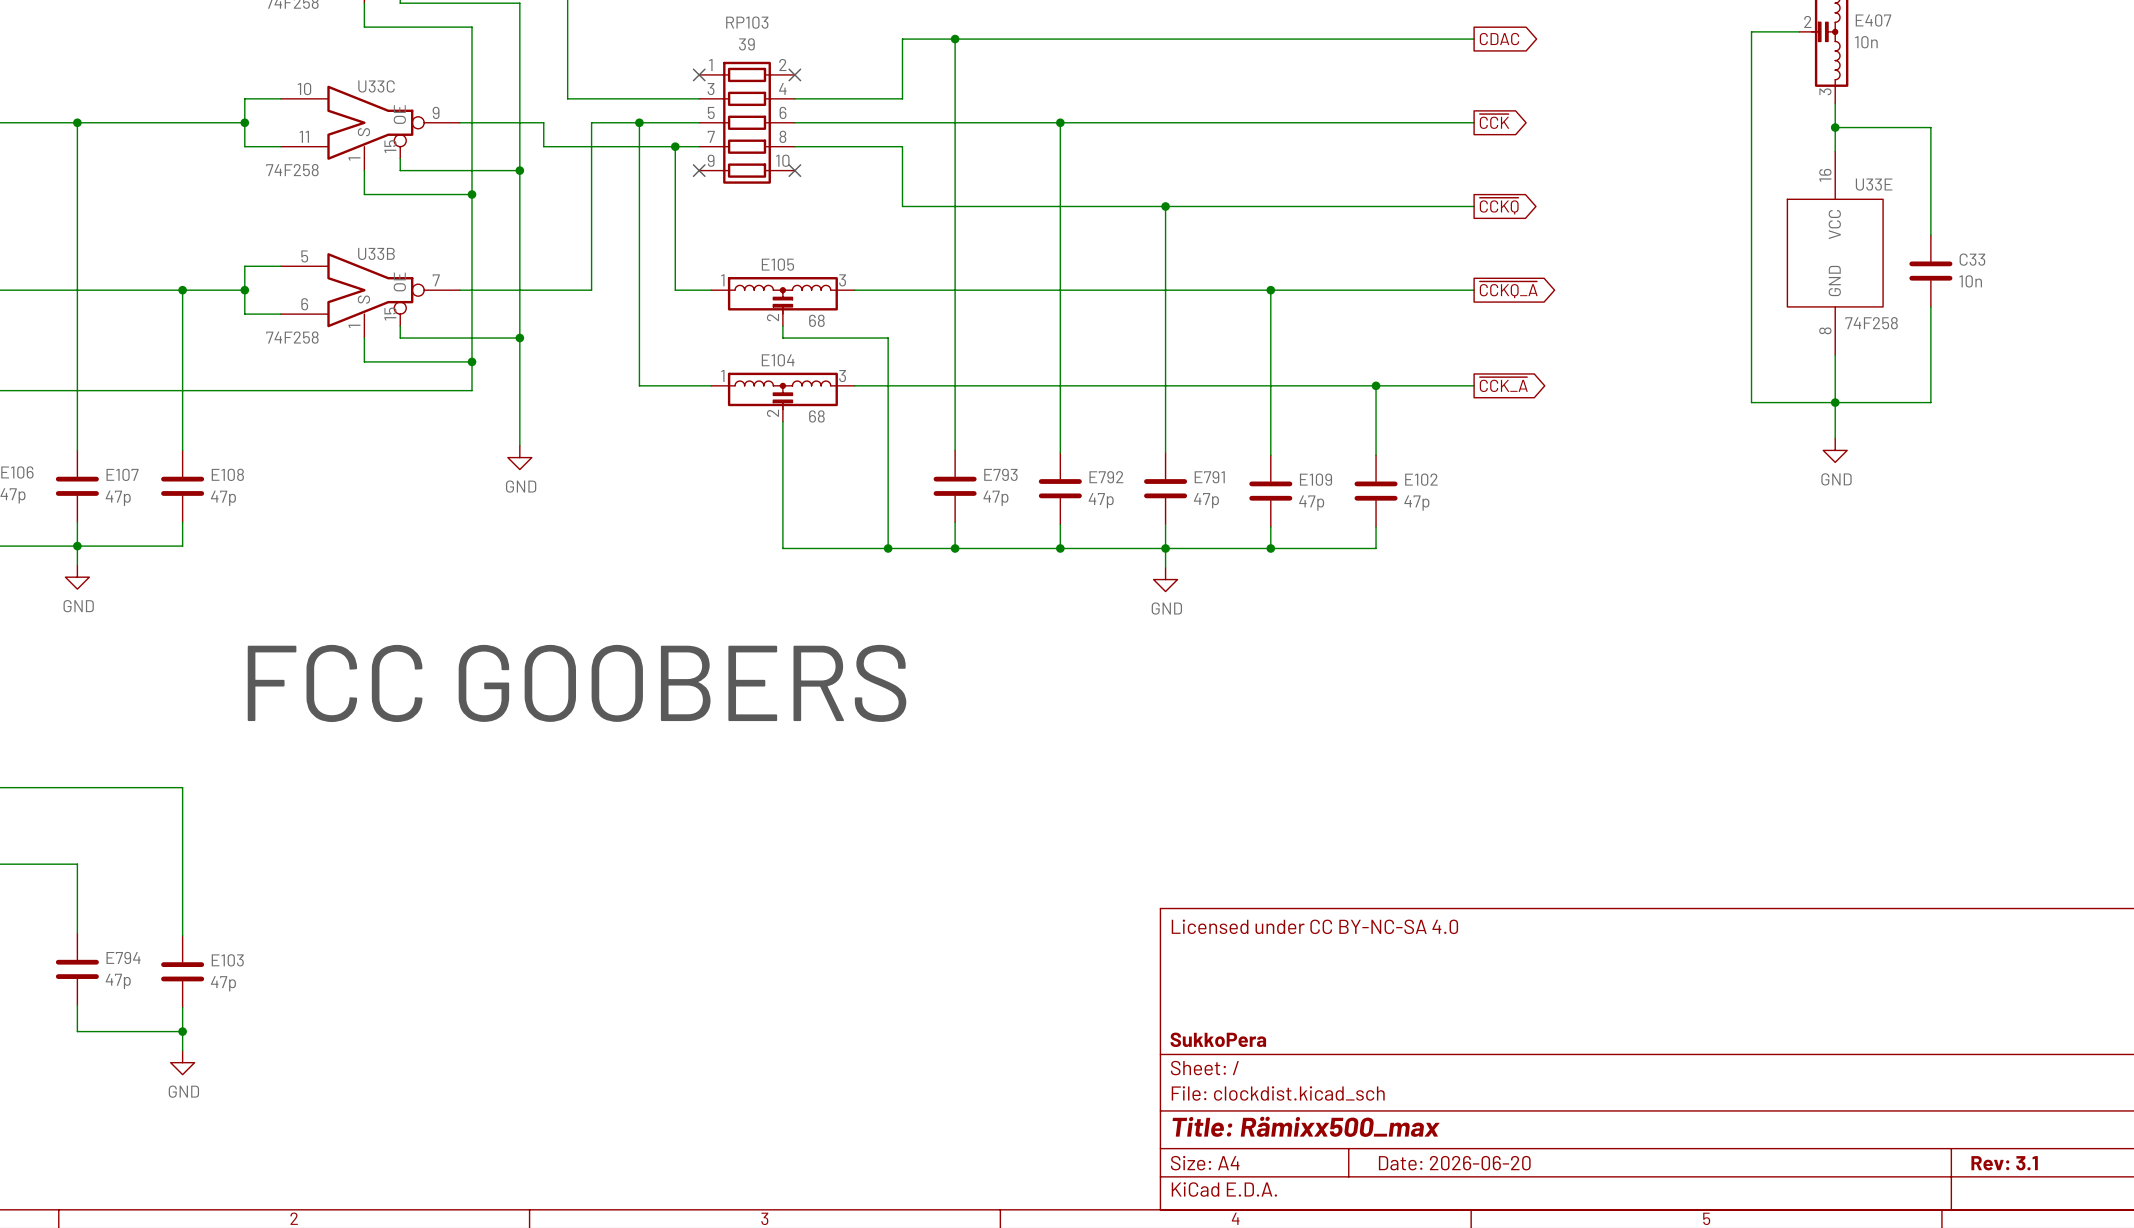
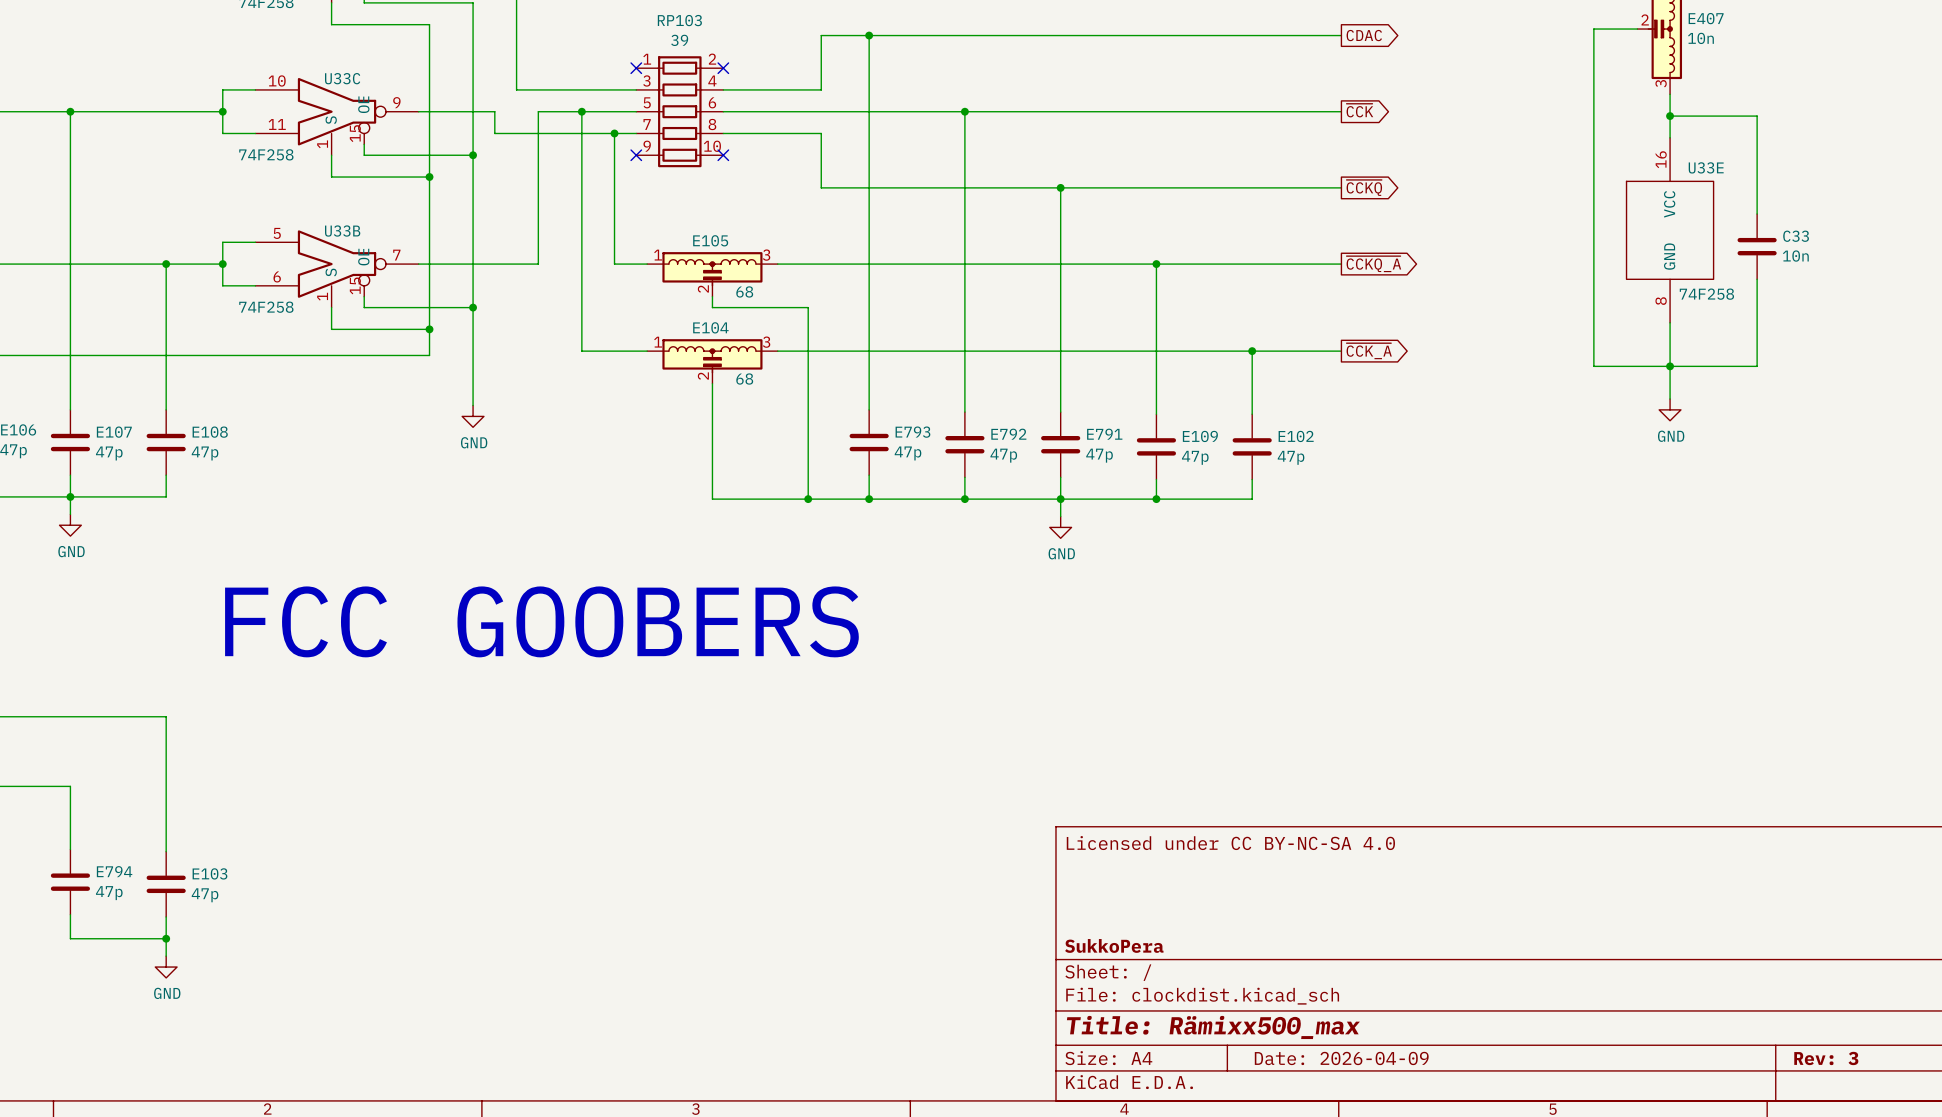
title block: Date: 2026-06-20 (1454, 1163) -> Date: 2026-04-09 (1341, 1058)
title block: Rev: 3.1 (2004, 1163) -> Rev: 3 (1826, 1058)

